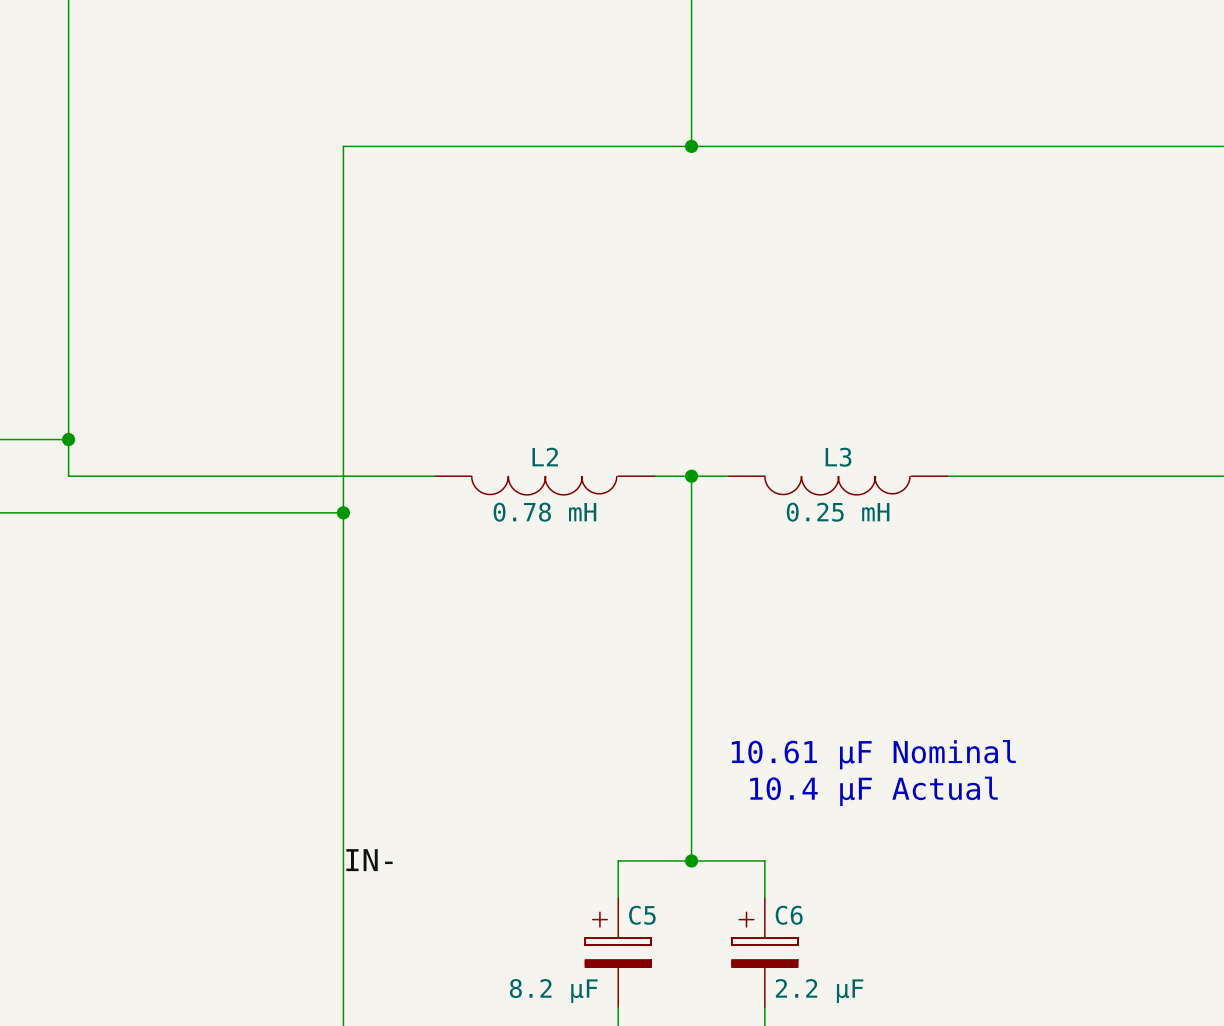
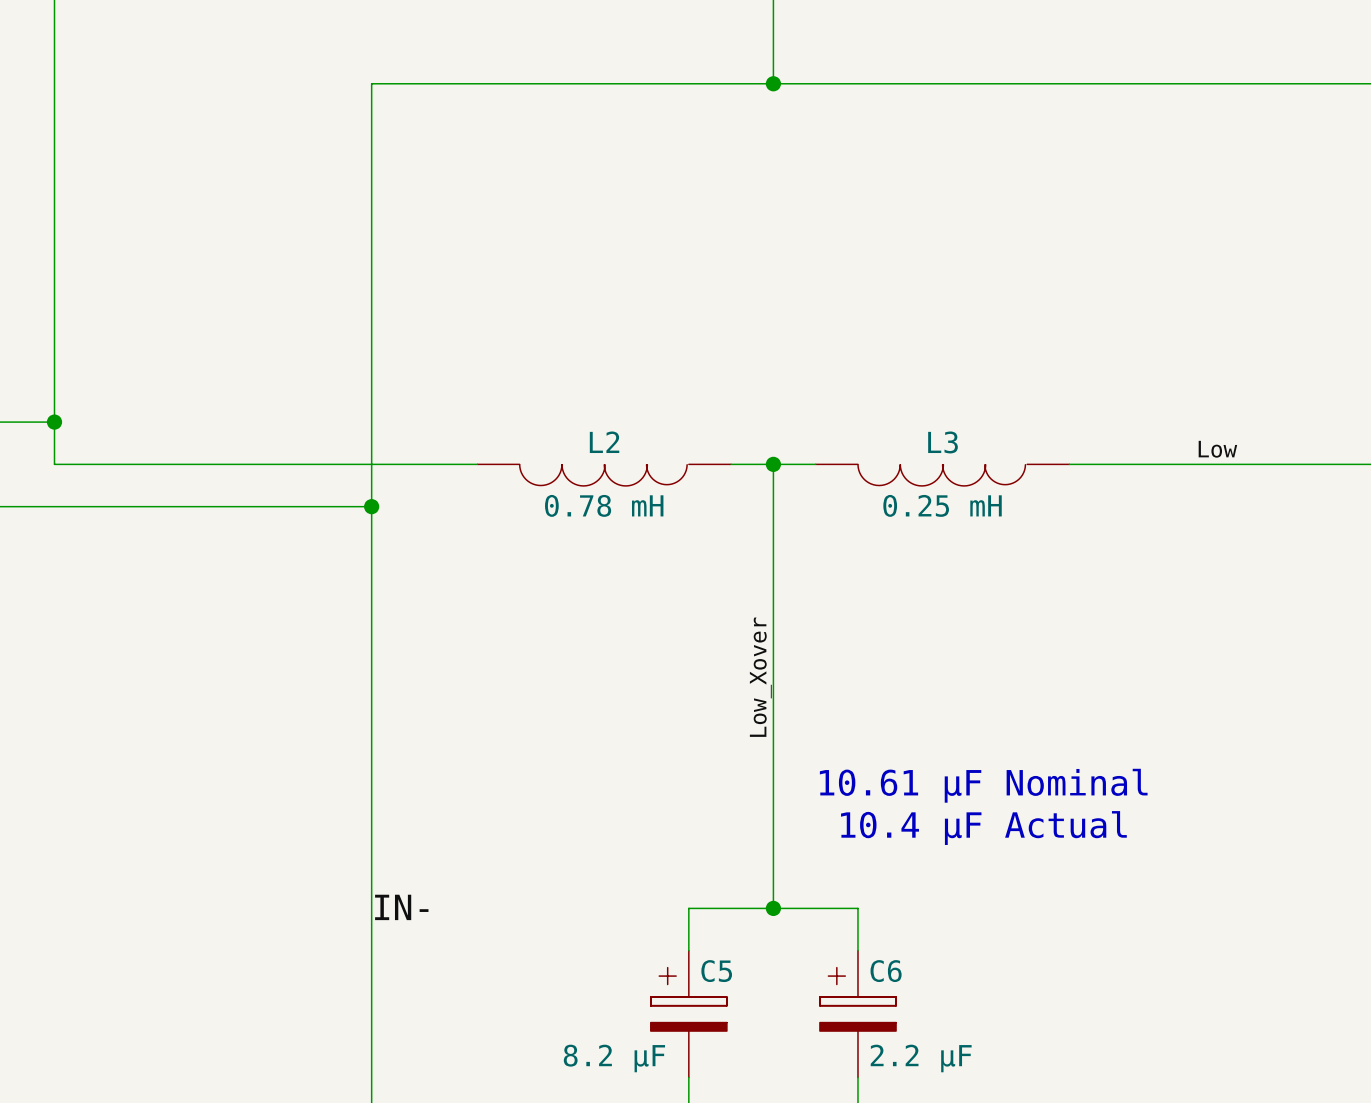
label: none -> Low (1217, 449)
label: none -> Low_Xover (760, 677)

